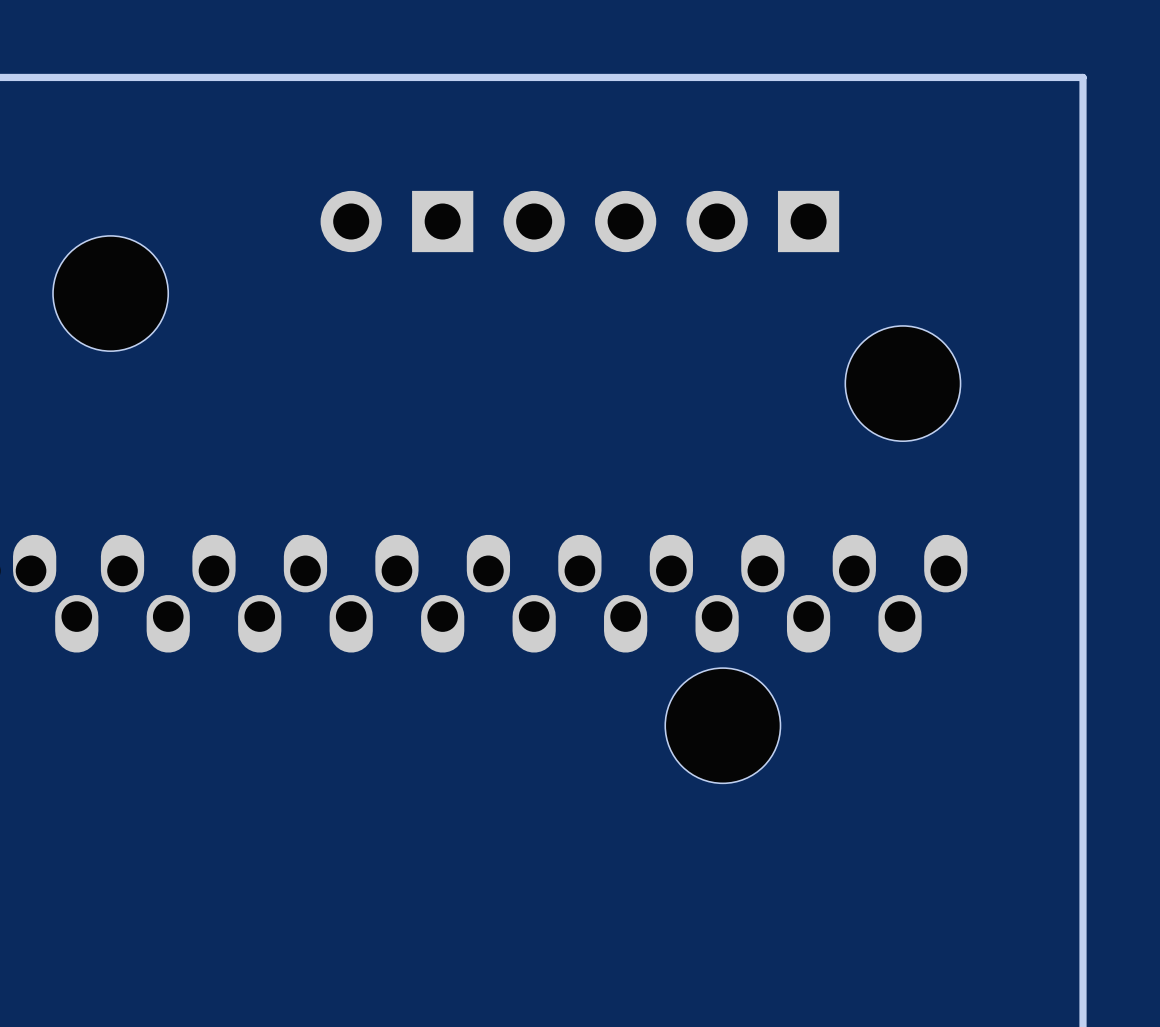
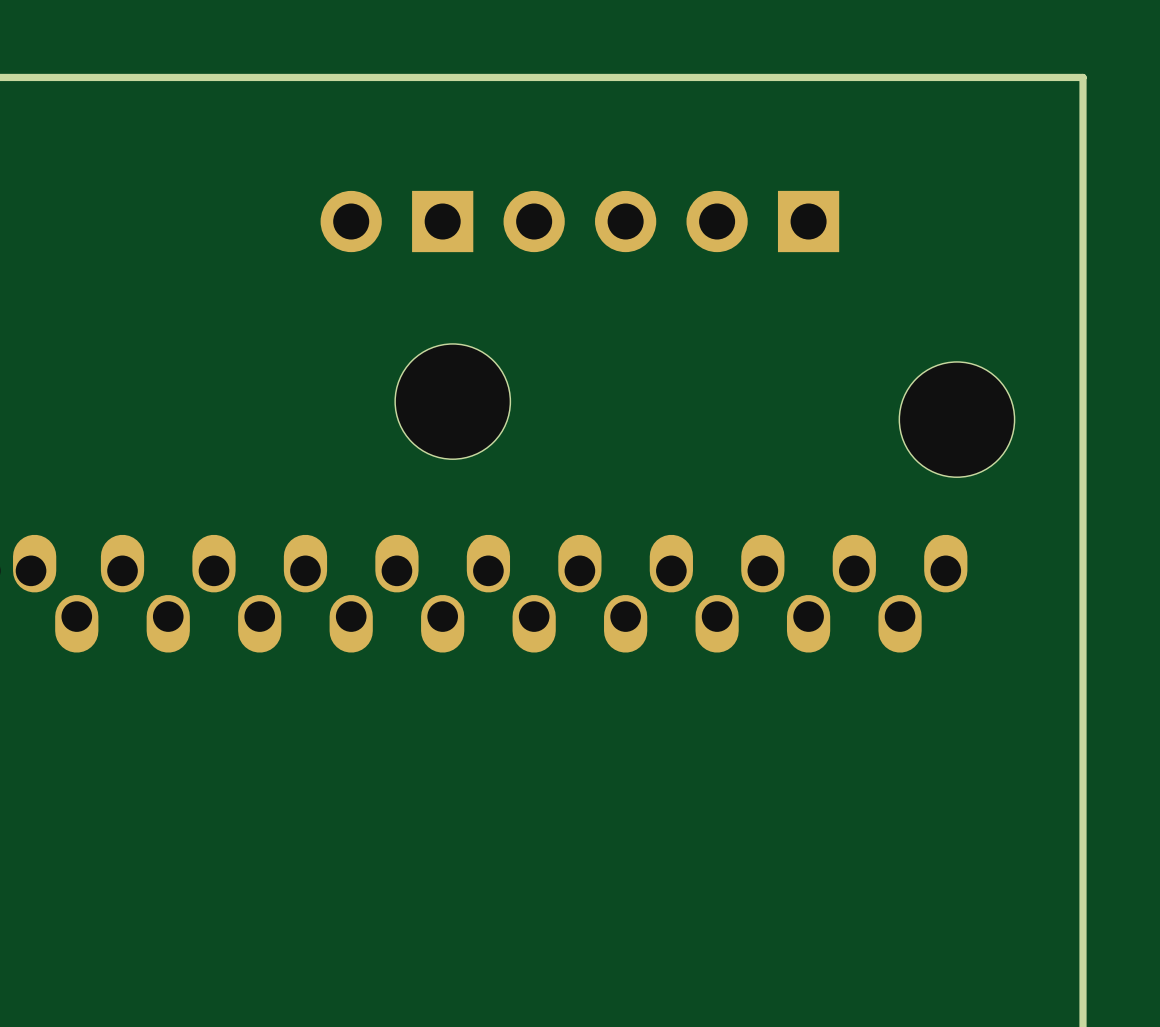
part: (110, 293) -> none
part position: (902, 383) -> (956, 419)
part: none -> (452, 401)
part: (722, 725) -> none

